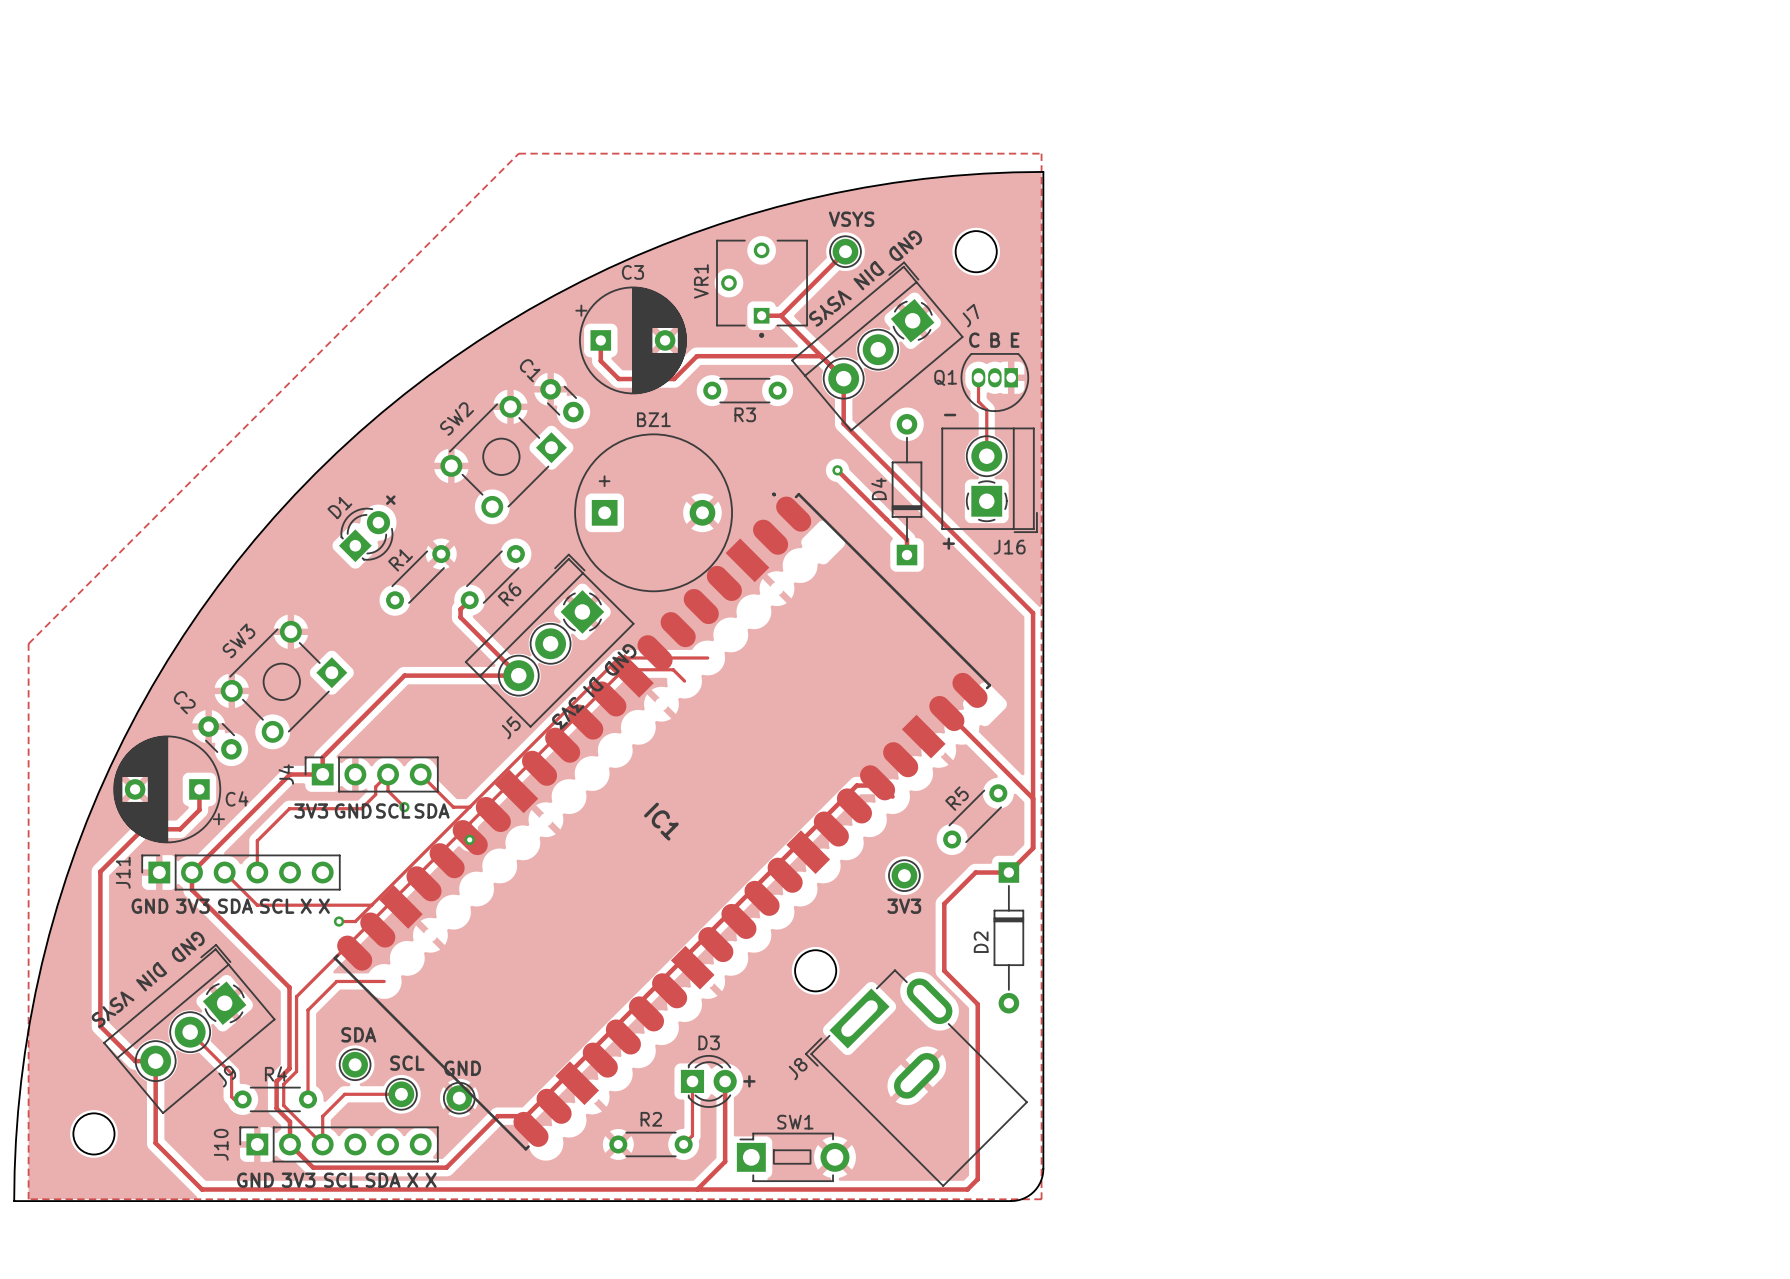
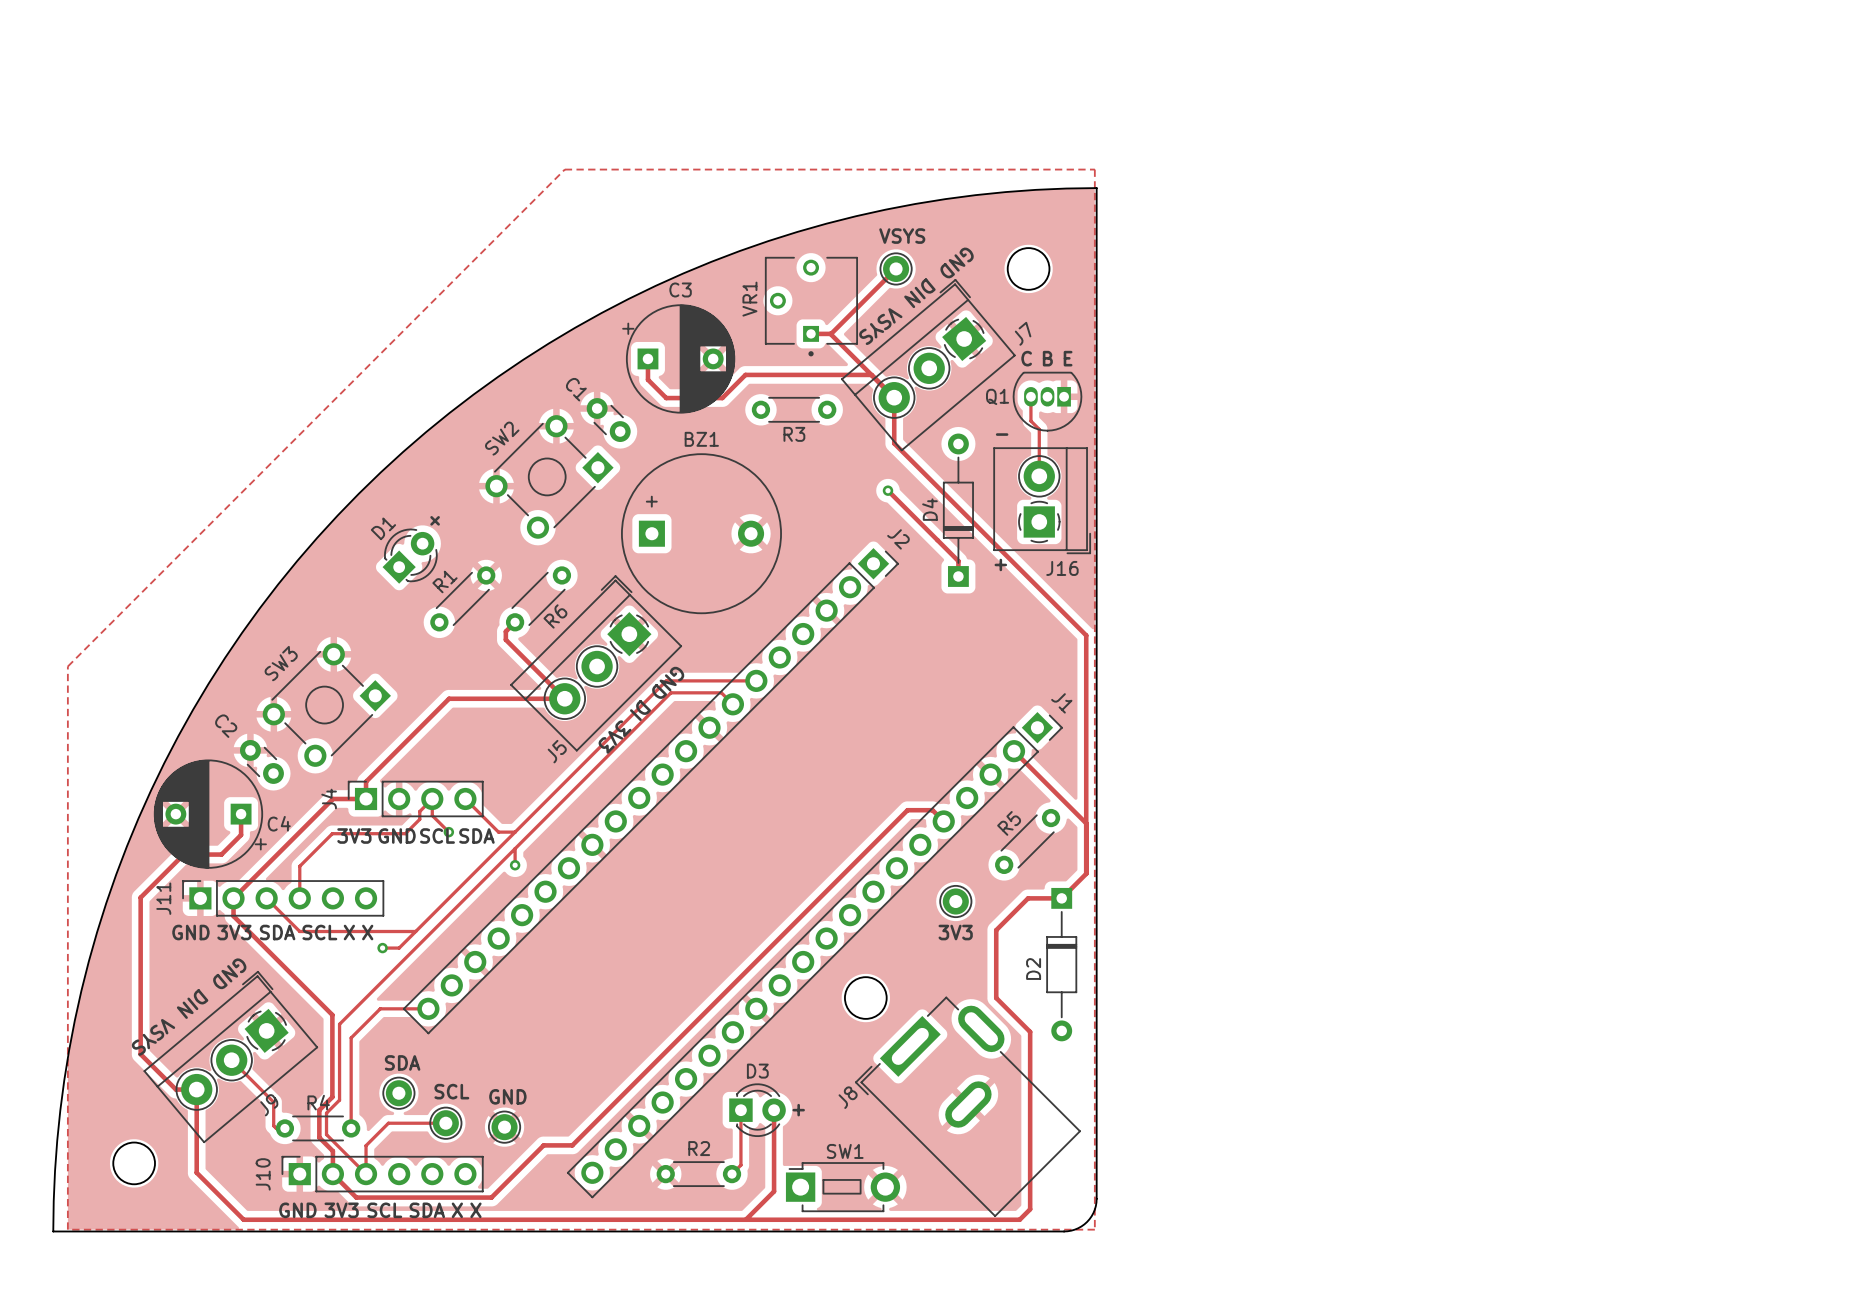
J2: none -> (650, 791)
IC1: (662, 821) -> none
J1: none -> (814, 955)

